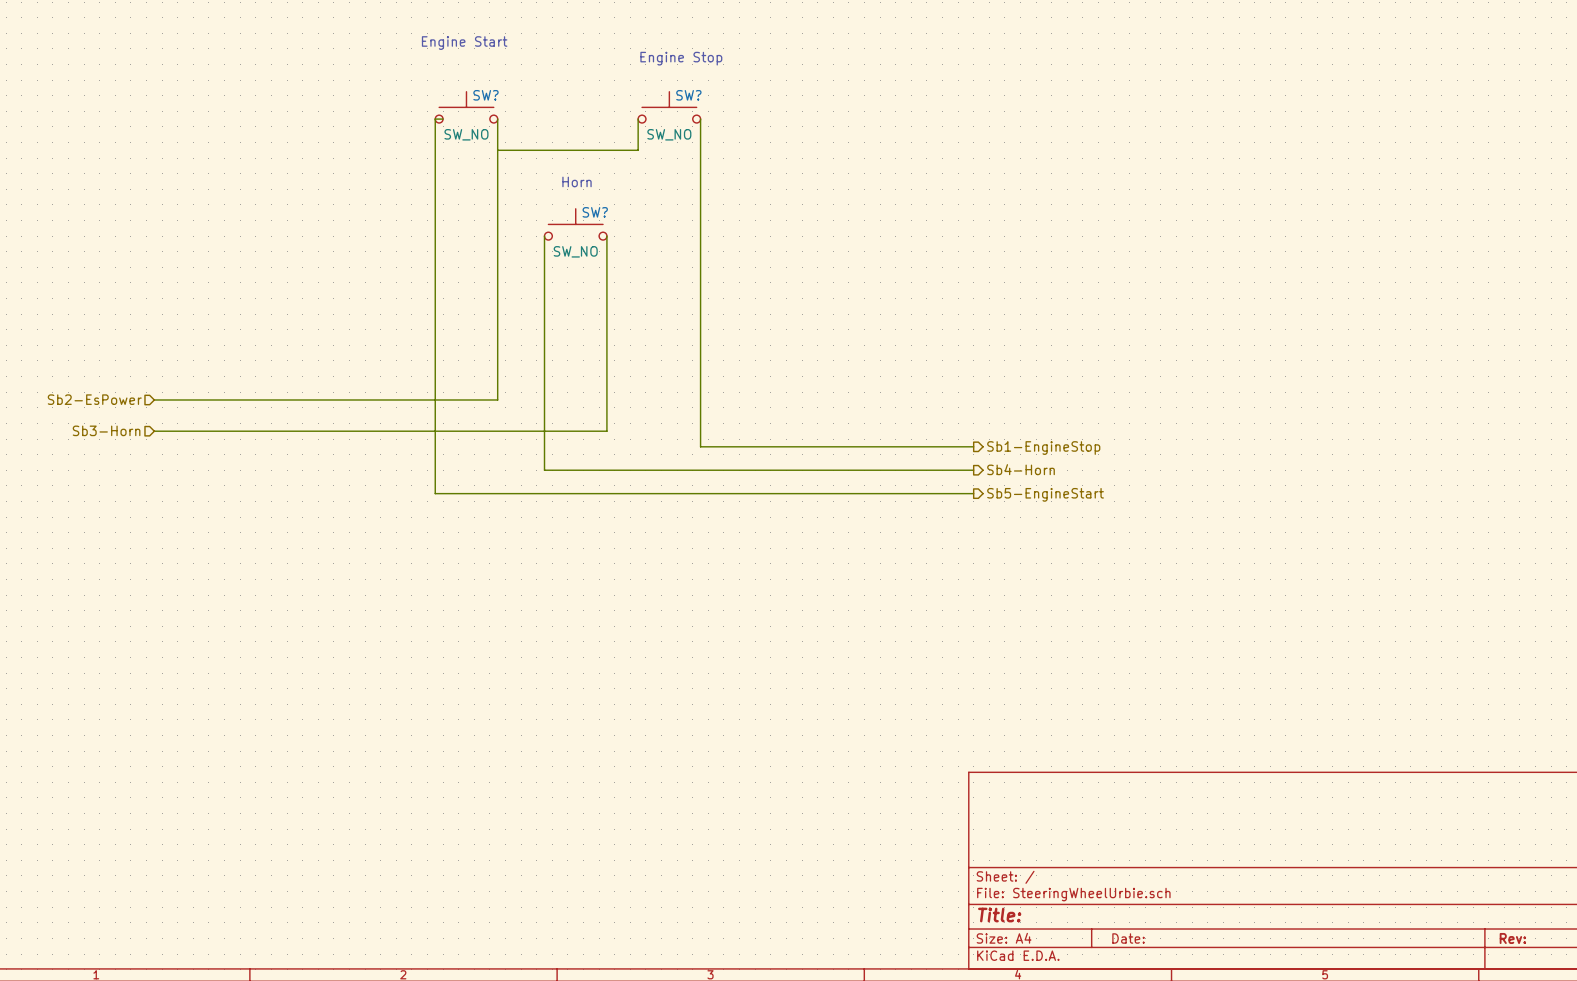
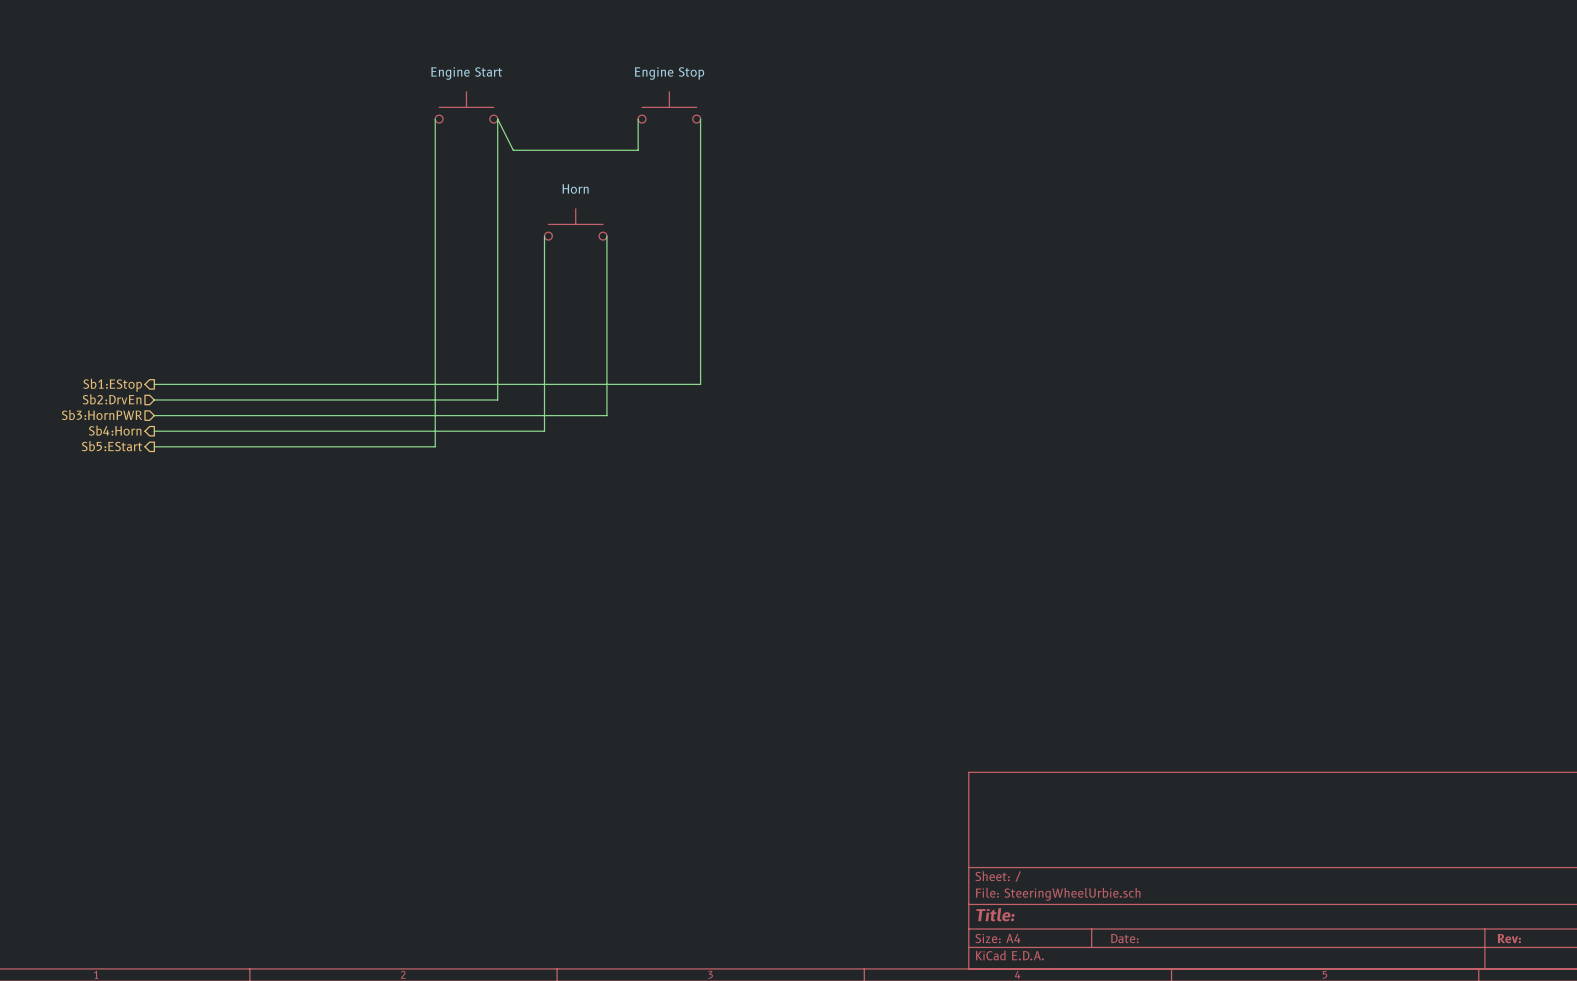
text: Engine Start (464, 43) -> none
text: Engine Stop (681, 58) -> none
SW? name: SW? (485, 95) -> none
SW? name: SW? (688, 95) -> none
wire: (435, 119) (443, 119) -> none
SW? value: SW_NO (466, 134) -> Engine Start (466, 73)
SW? value: SW_NO (669, 134) -> Engine Stop (669, 73)
wire: (497, 150) (513, 150) -> (497, 119) (513, 150)
text: Horn (577, 181) -> none
SW? name: SW? (595, 212) -> none
SW? value: SW_NO (575, 251) -> Horn (575, 189)
wire: (700, 384) (700, 446) (973, 446) -> (700, 384) (154, 384)
hierarchical label: none -> Sb1:EStop (112, 385)
hierarchical label: Sb2-EsPower (94, 399) -> Sb2:DrvEn (112, 399)
hierarchical label: none -> Sb3:HornPWR (102, 414)
wire: (606, 415) (606, 431) (544, 431) (544, 470) (973, 470) -> (606, 415) (154, 415)
hierarchical label shape: input (106, 430) -> output (115, 430)
hierarchical label: Sb3-Horn (106, 430) -> Sb4:Horn (115, 430)
hierarchical label: none -> Sb5:EStart (112, 446)
wire: (435, 446) (435, 493) (973, 493) -> (435, 446) (154, 446)
hierarchical label: Sb1-EngineStop (1043, 448) -> none
hierarchical label: Sb4-Horn (1021, 469) -> none
hierarchical label: Sb5-EngineStart (1045, 494) -> none

